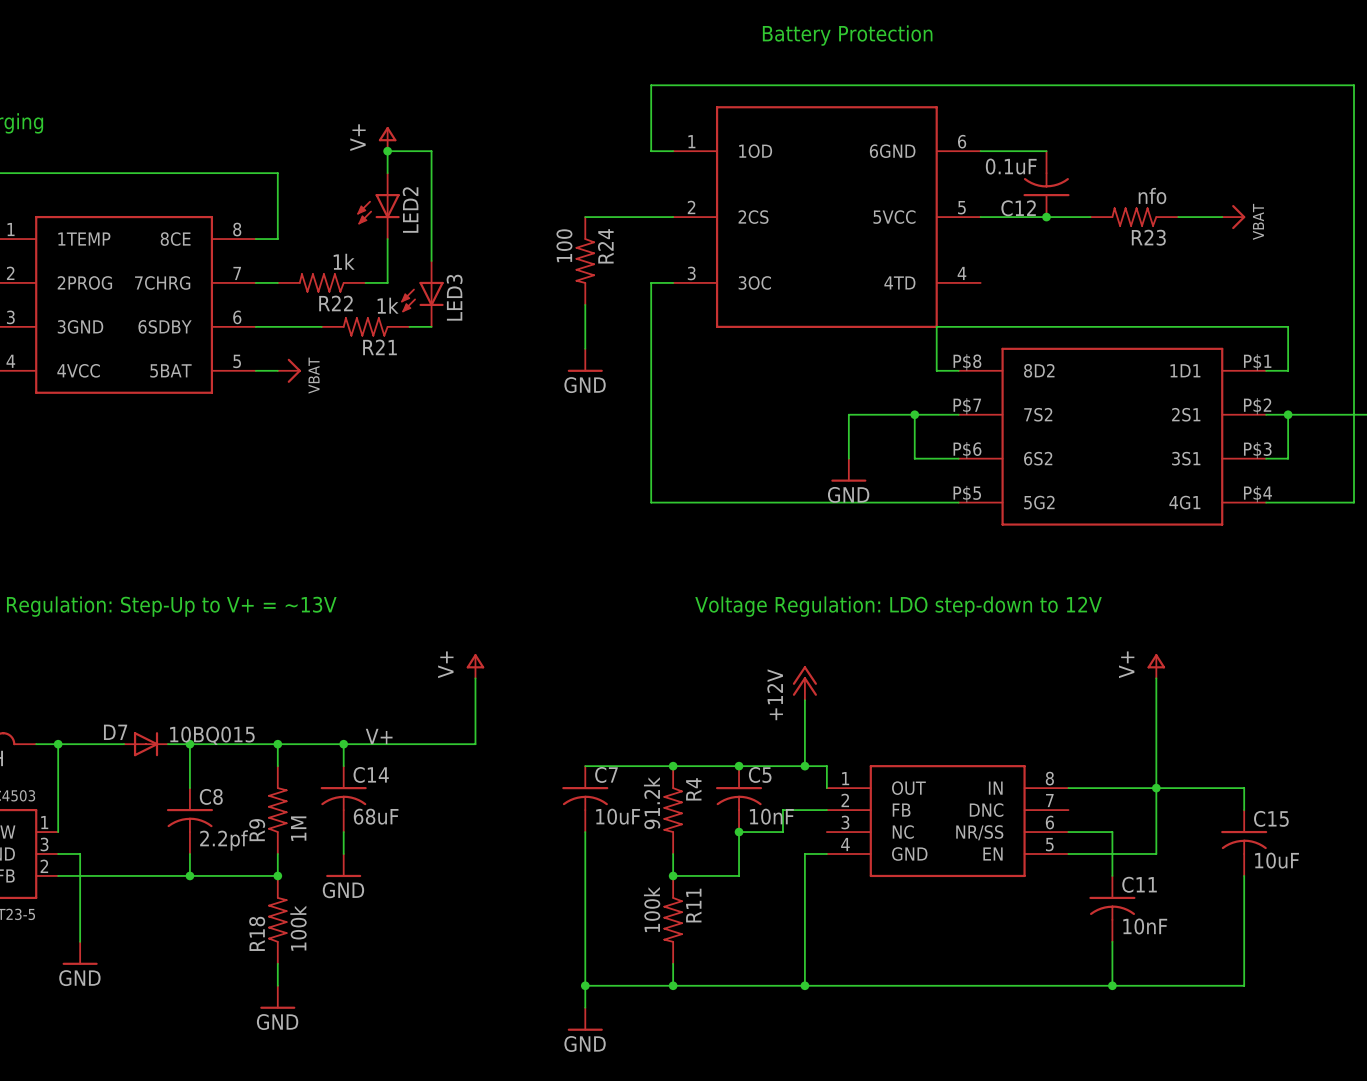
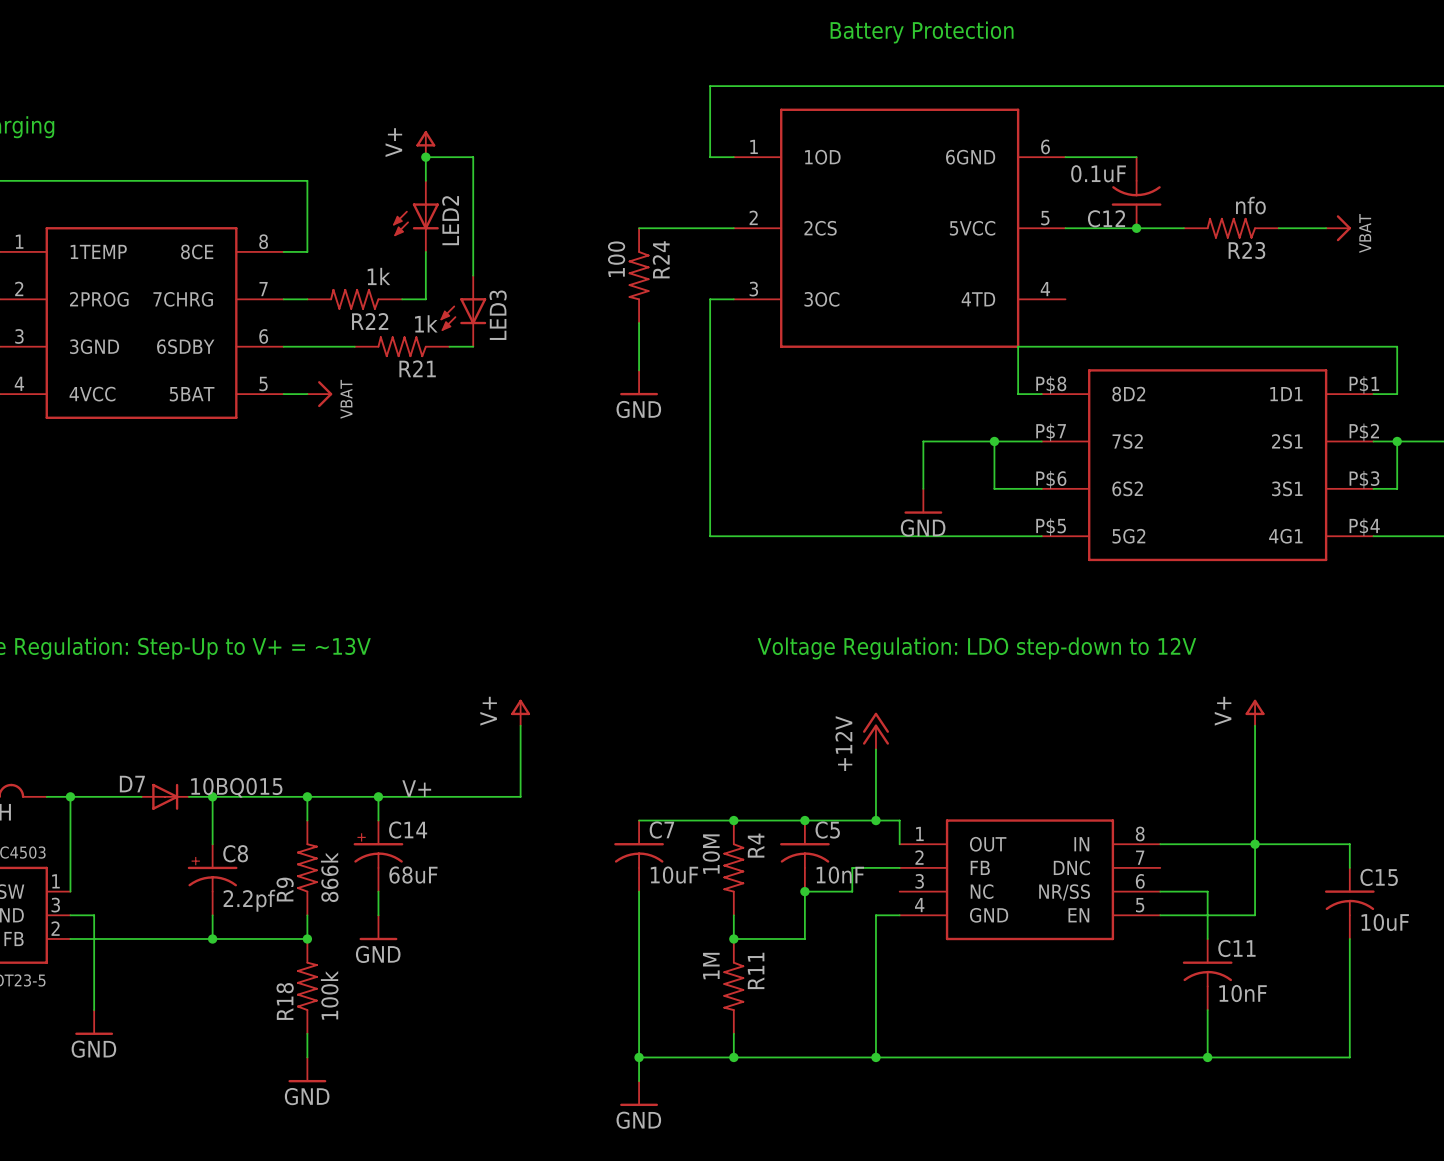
C14 symbol: [320, 766, 367, 833] -> [353, 820, 404, 892]
C8 symbol: [166, 788, 214, 855] -> [187, 844, 238, 916]
R4 value: 91.2k (652, 803) -> 10M (711, 854)
R9 value: 1M (298, 828) -> 866k (329, 877)
R11 value: 100k (652, 909) -> 1M (711, 966)

